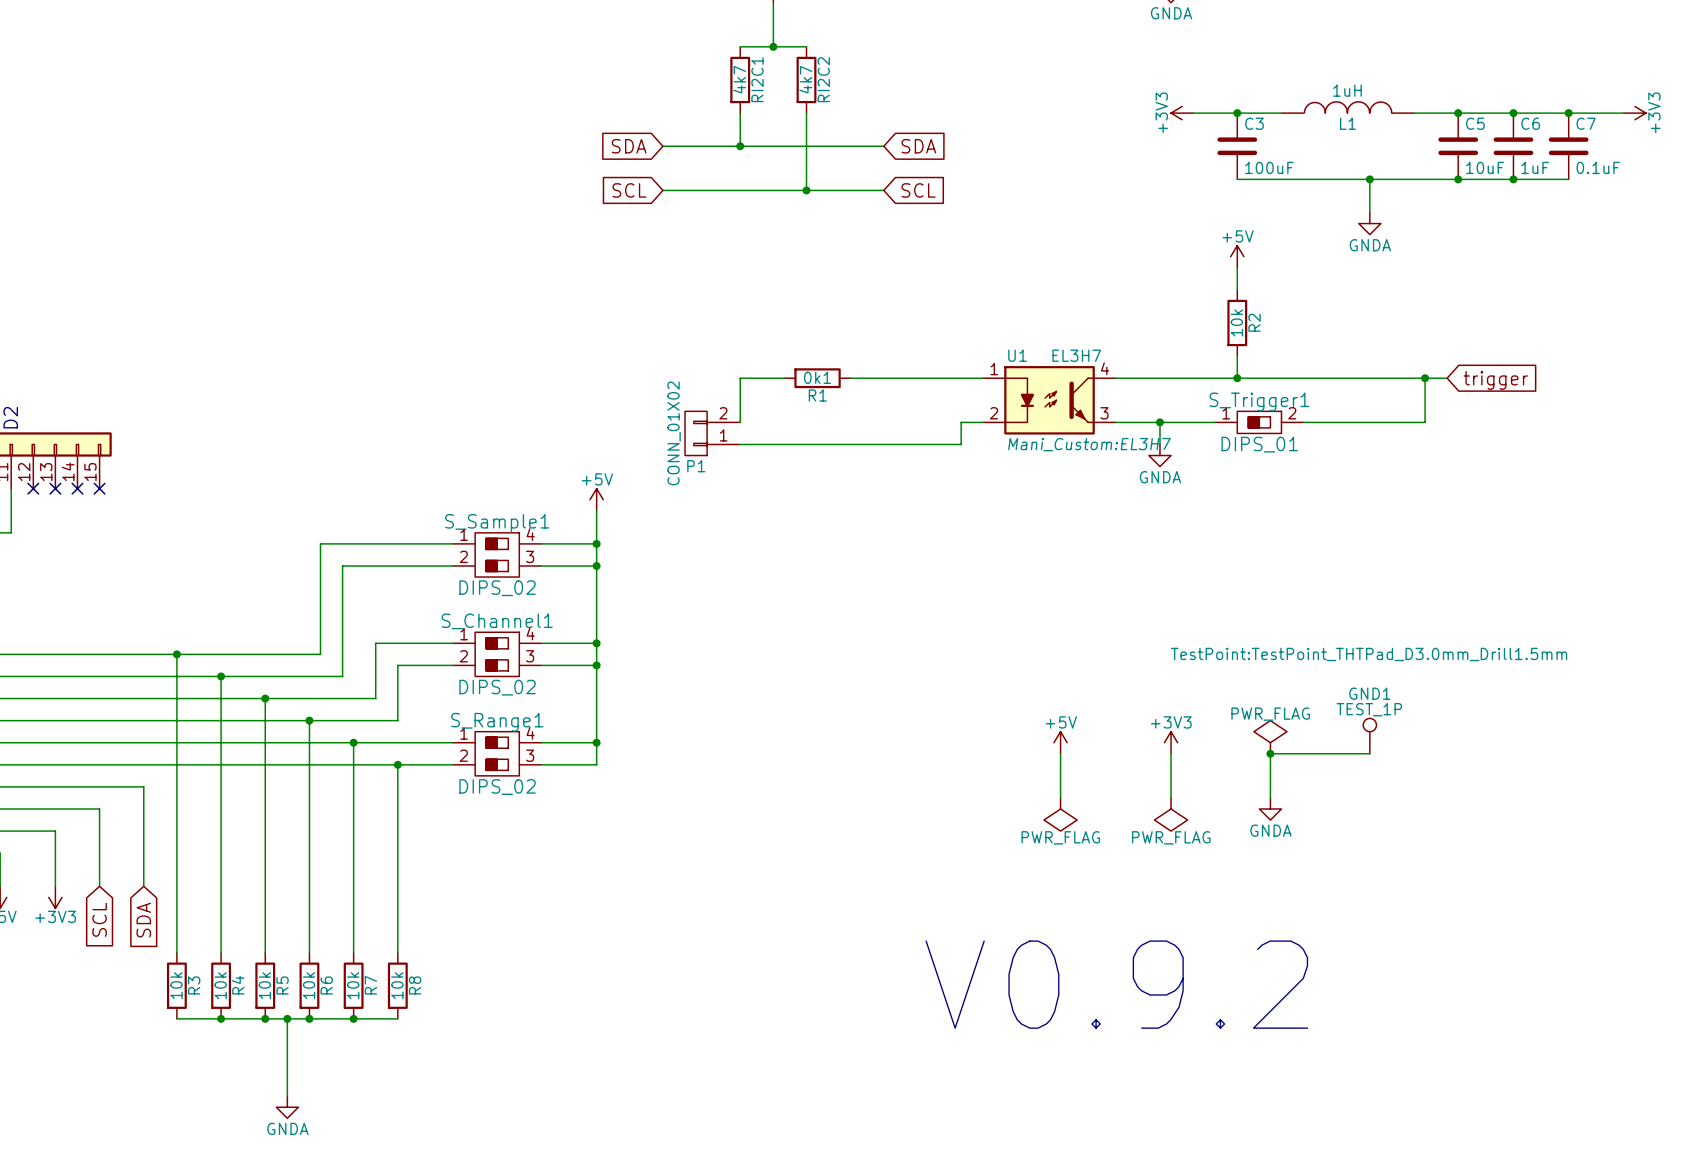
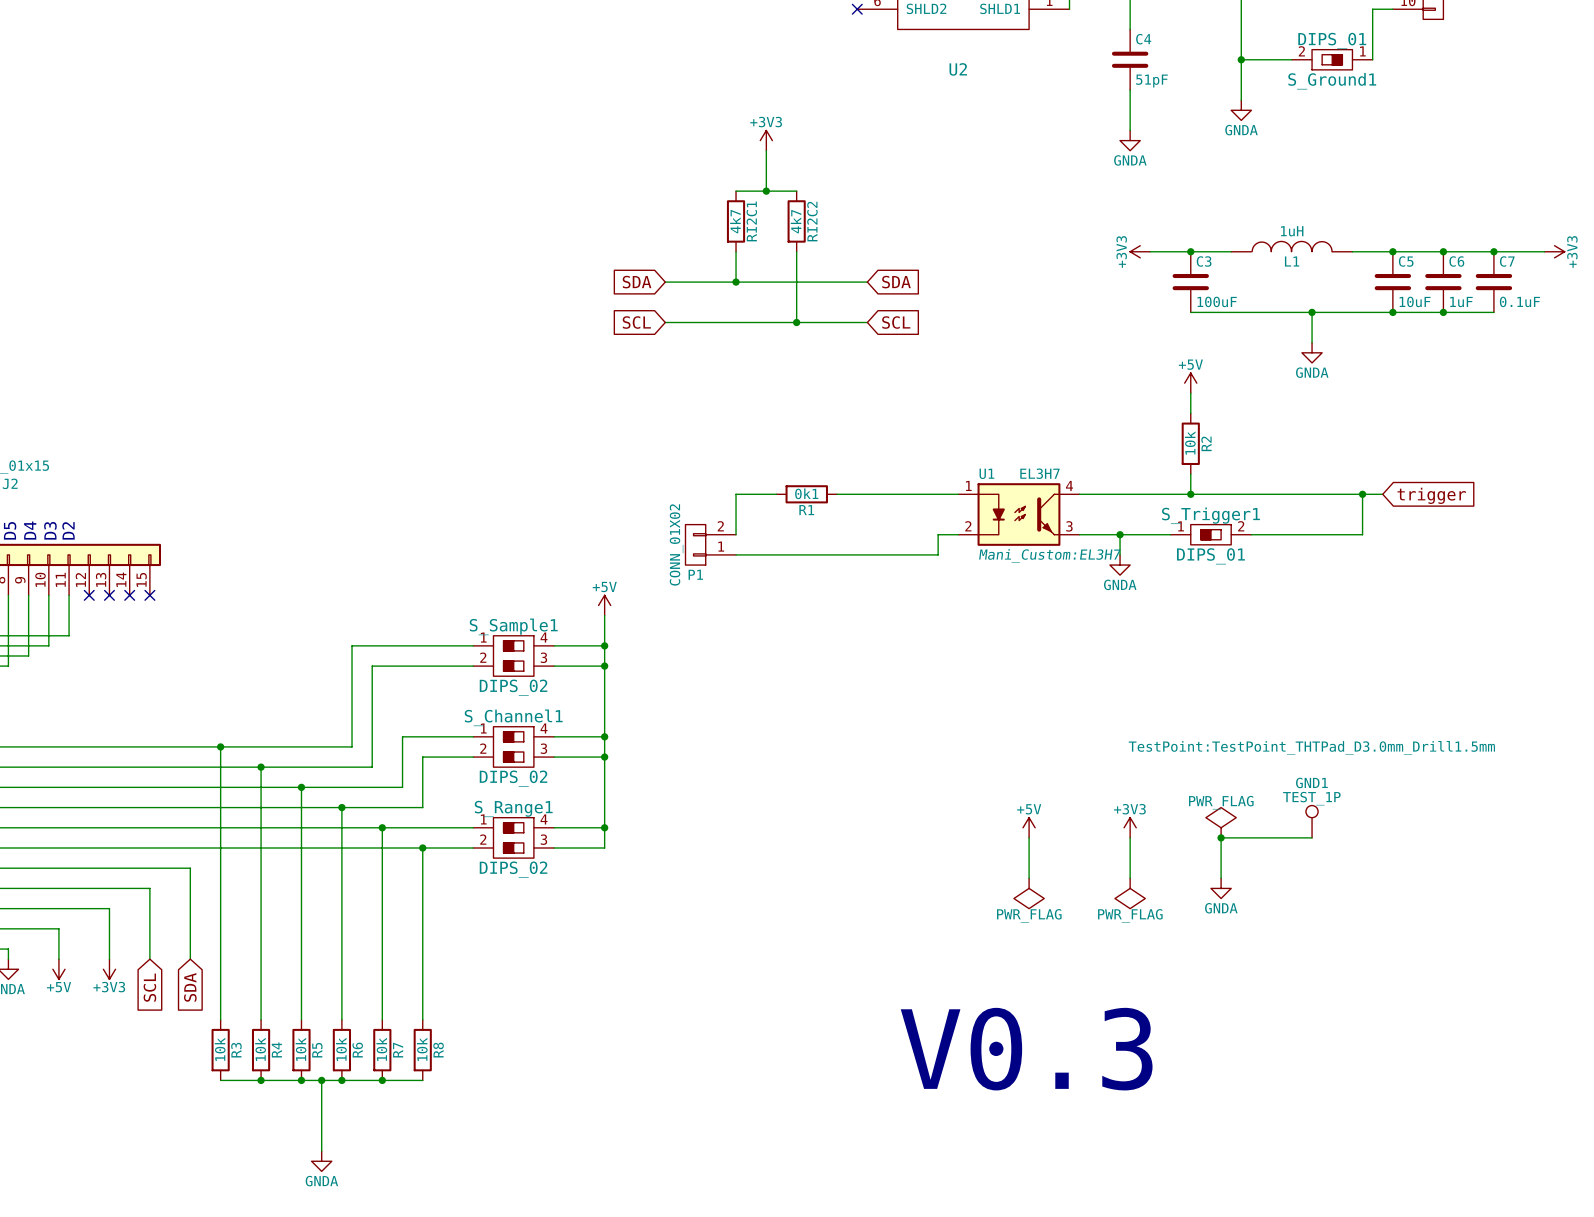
text: V0.9.2 (1116, 984) -> V0.3 (1026, 1049)

